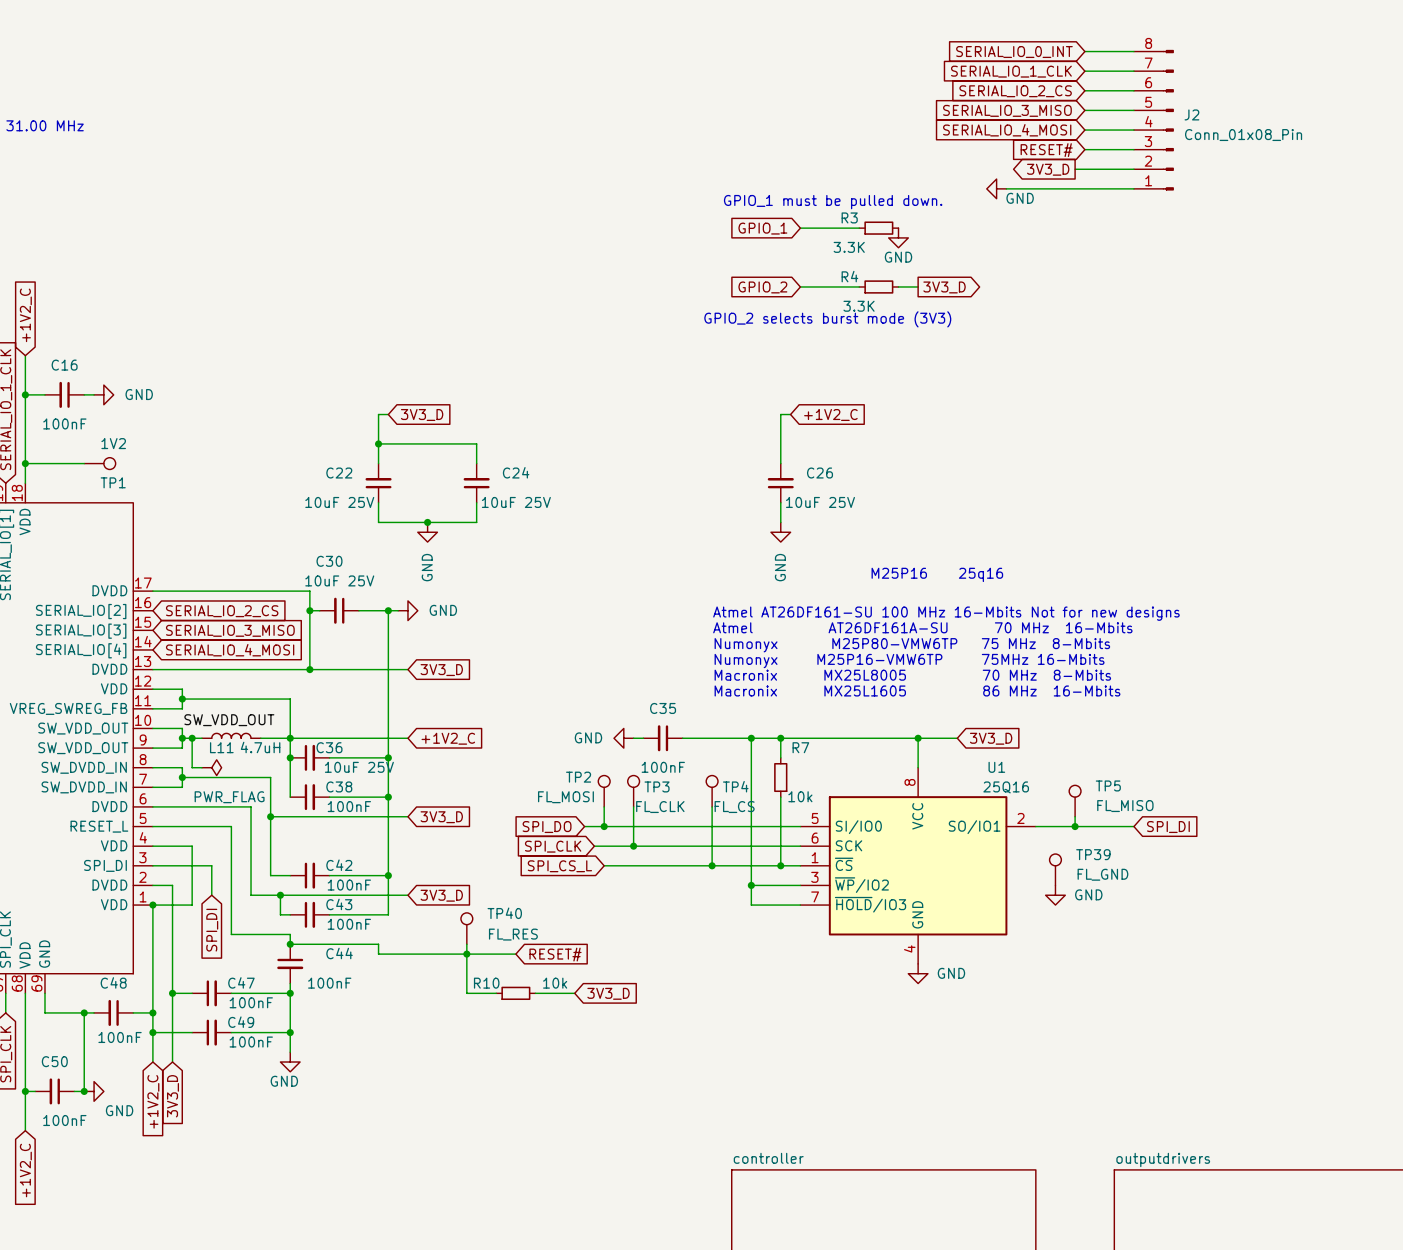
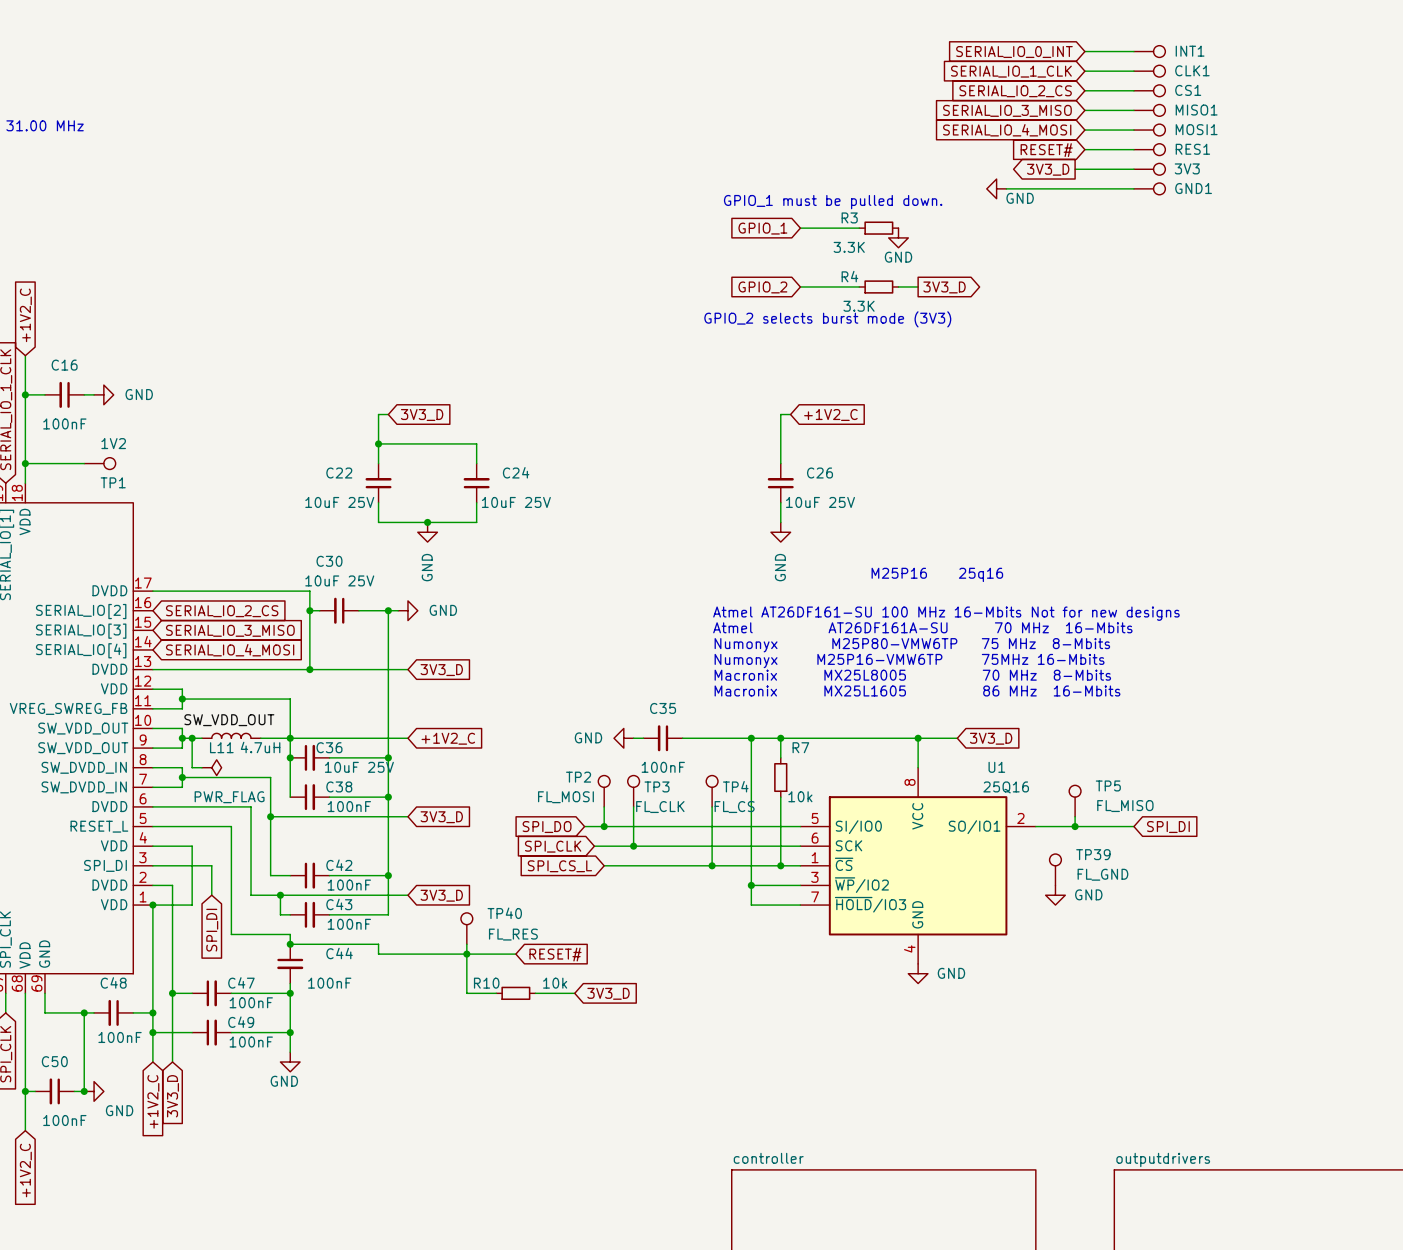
INT1: none -> (1149, 51)
CLK1: none -> (1149, 71)
CS1: none -> (1149, 90)
MISO1: none -> (1149, 110)
J2: Conn_01x08_Pin (1153, 120) -> none
MOSI1: none -> (1149, 130)
RES1: none -> (1149, 149)
3V3: none -> (1149, 169)
GND1: none -> (1149, 188)

